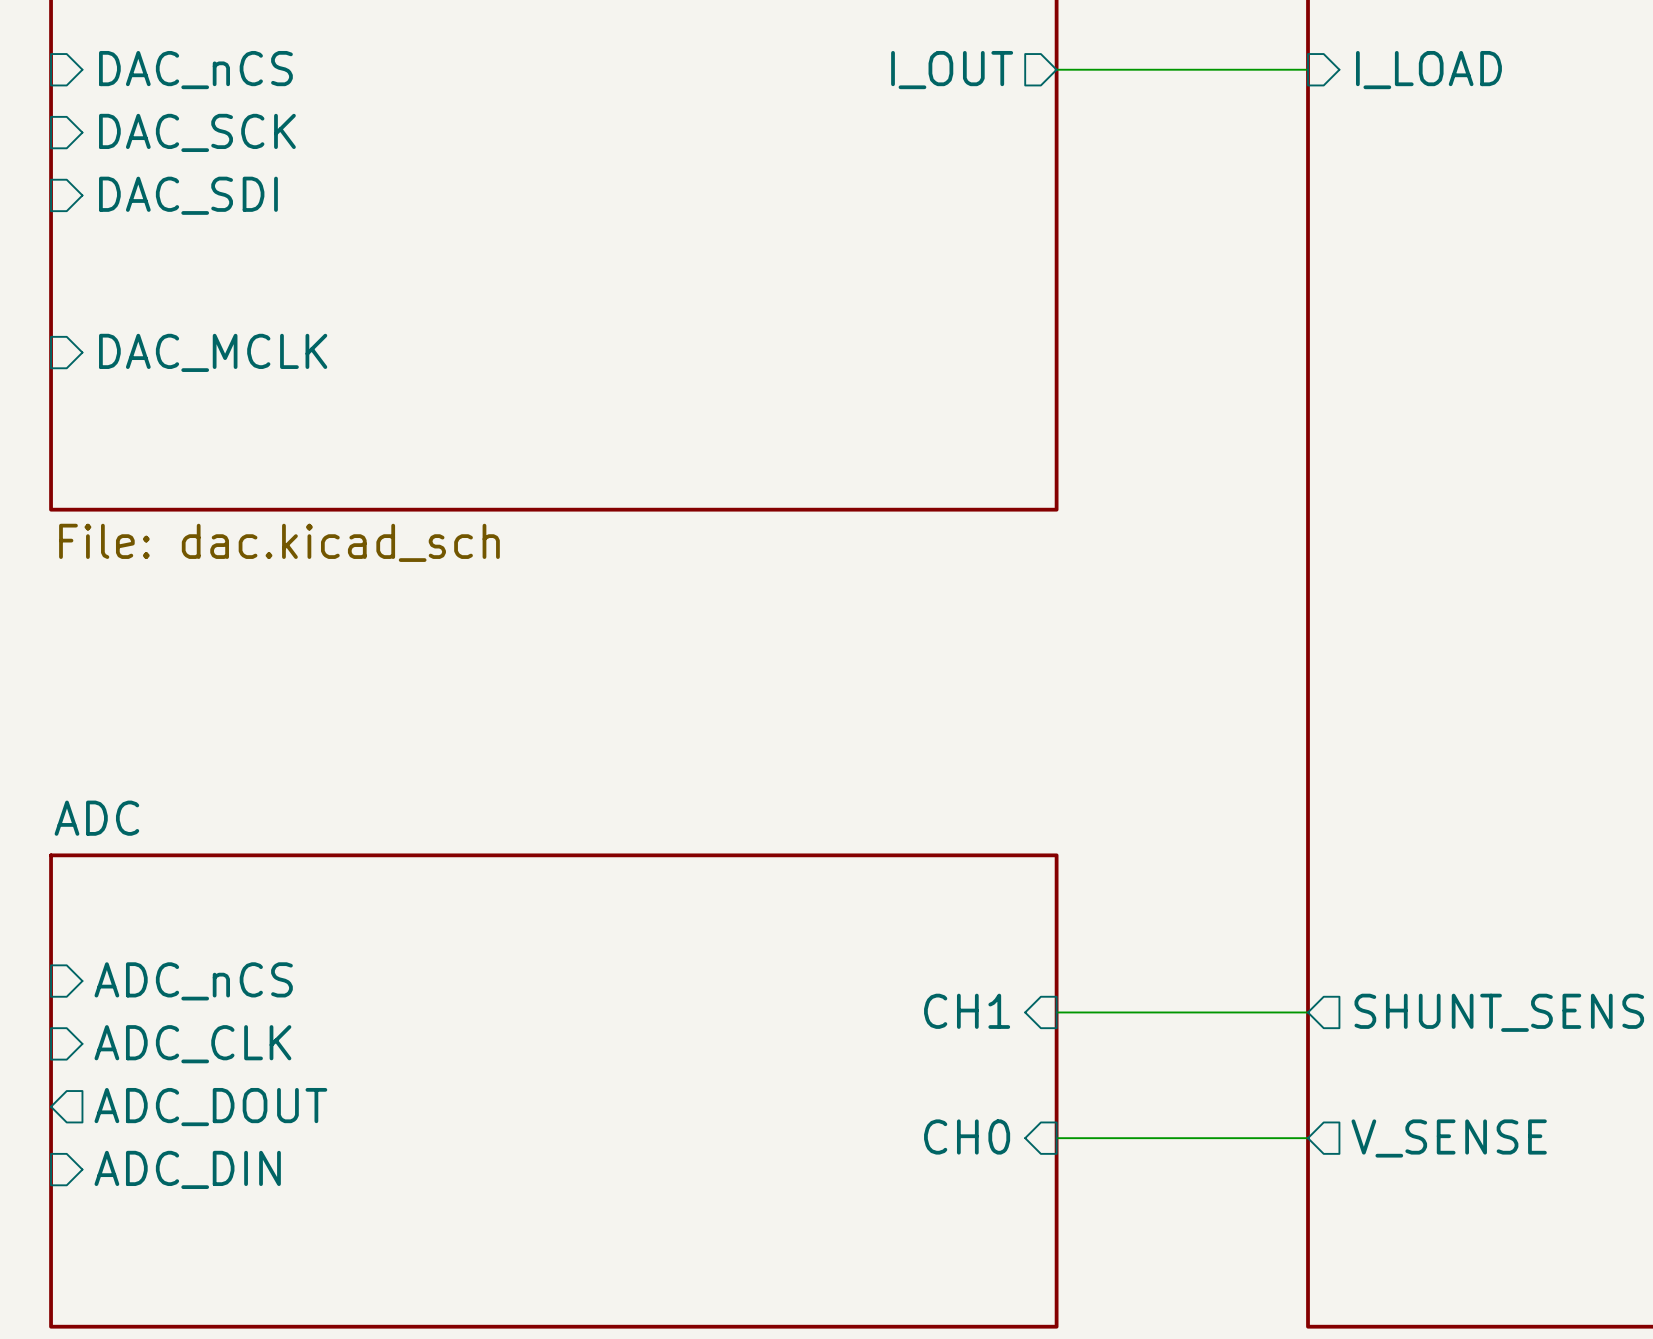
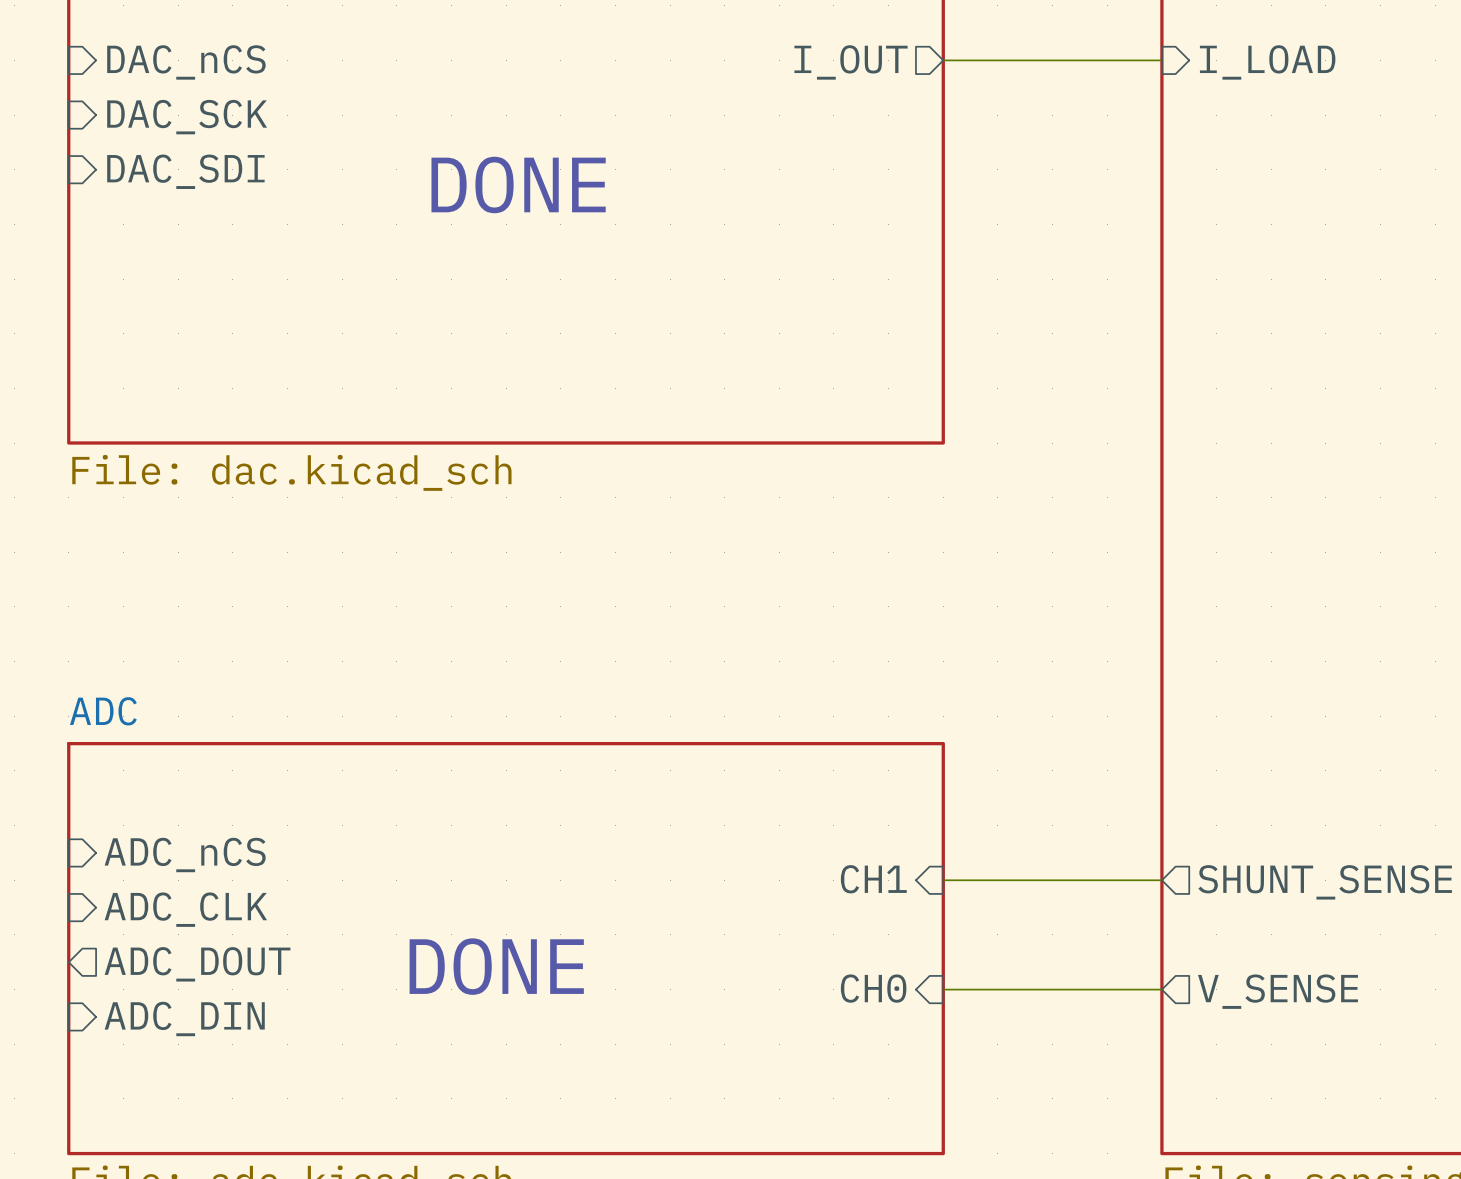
text: none -> DONE (518, 184)
sheet pin: DAC_MCLK (213, 352) -> none
text: none -> DONE (496, 966)

